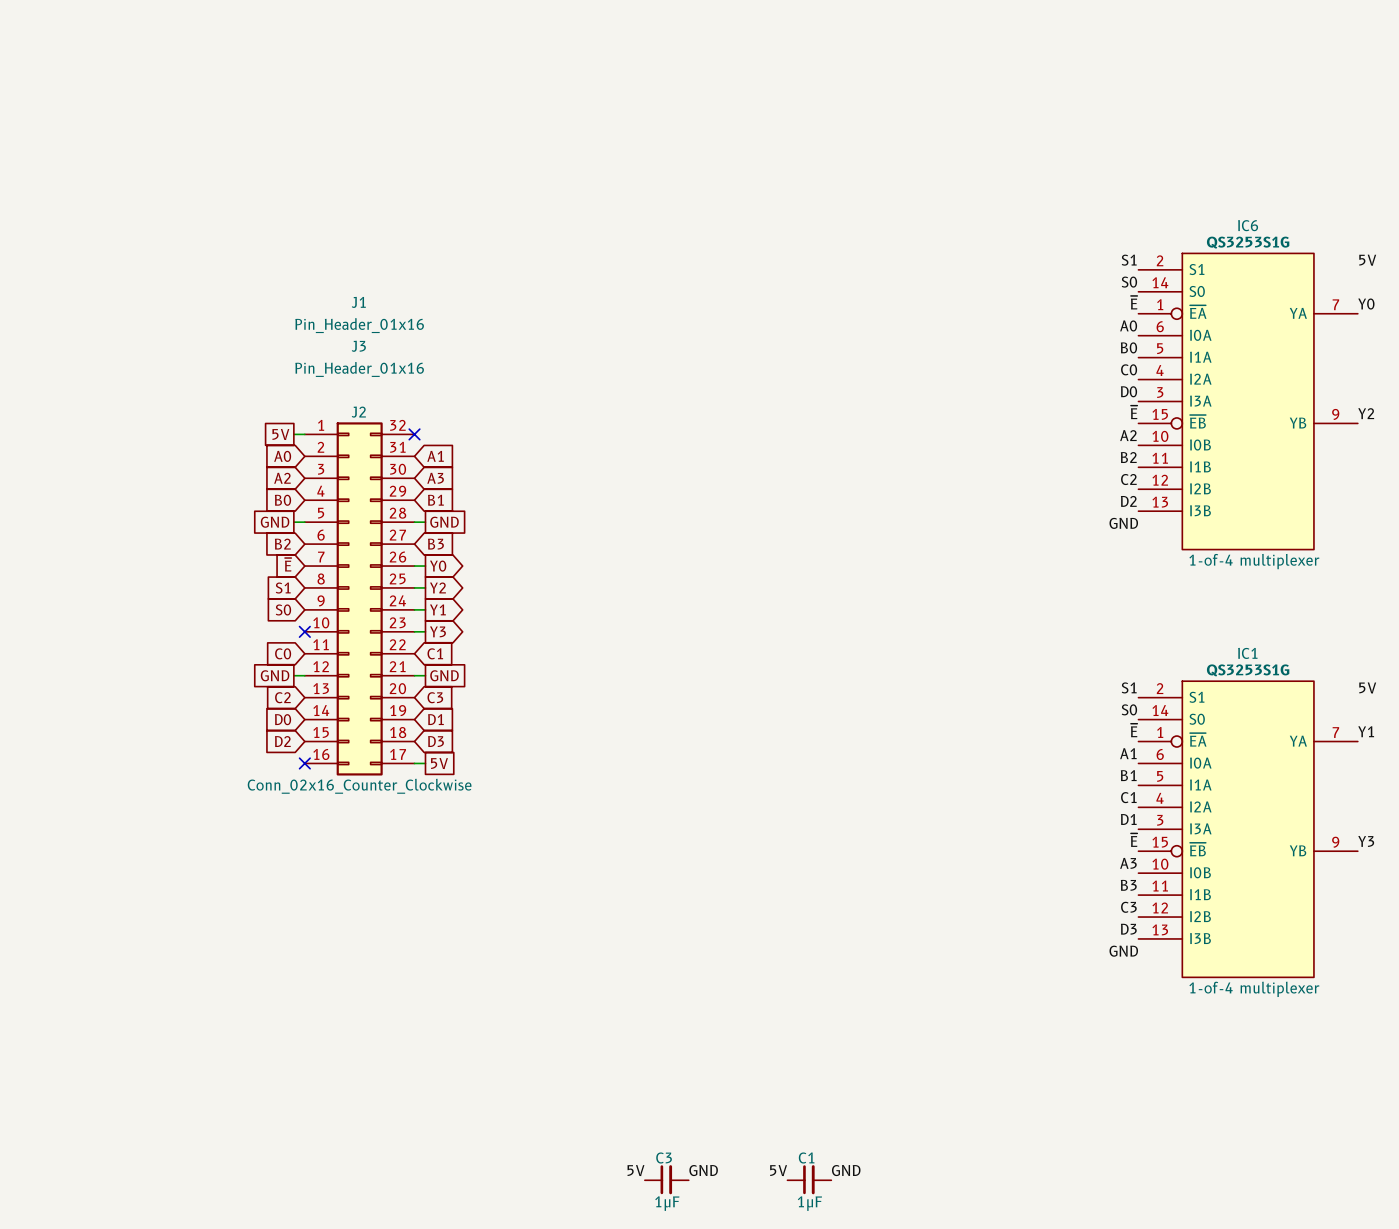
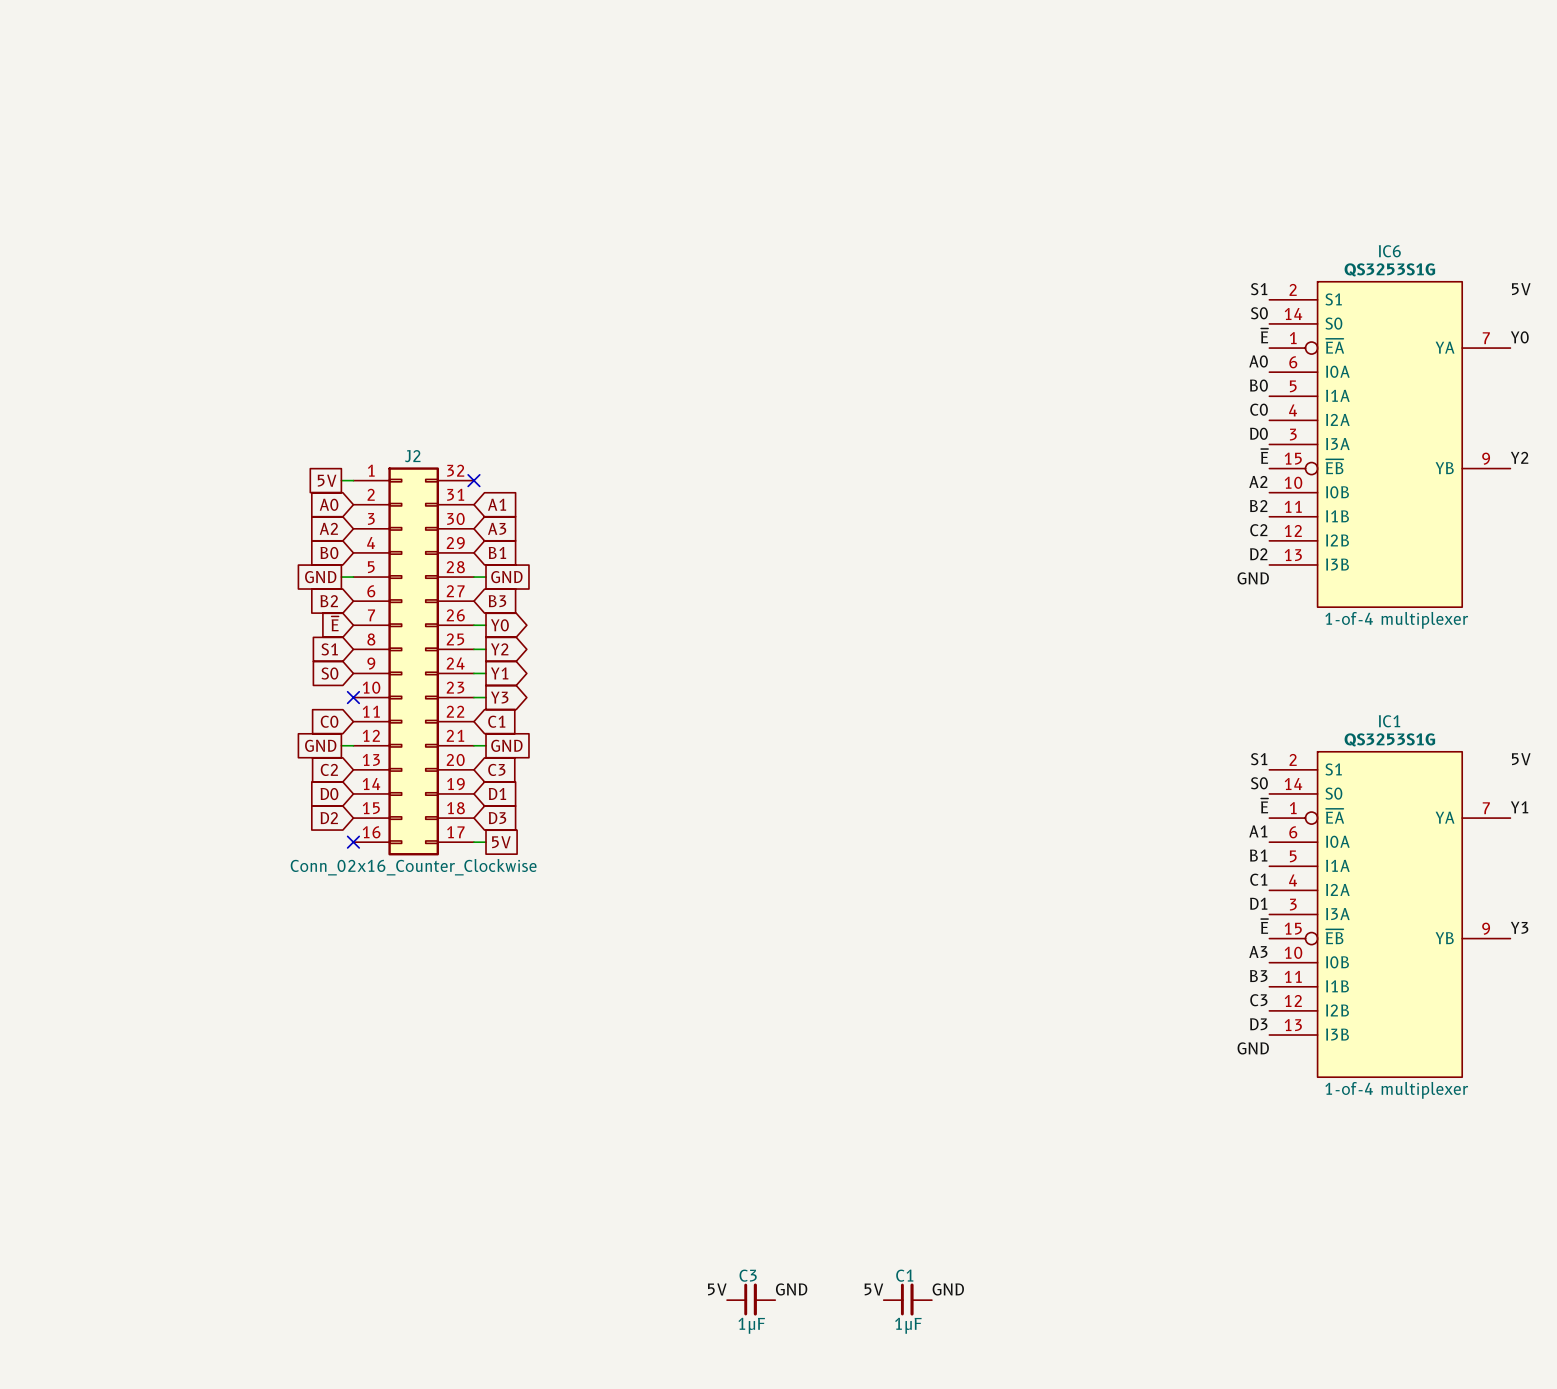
J1: Pin_Header_01x16 (359, 314) -> none
J3: Pin_Header_01x16 (359, 358) -> none

